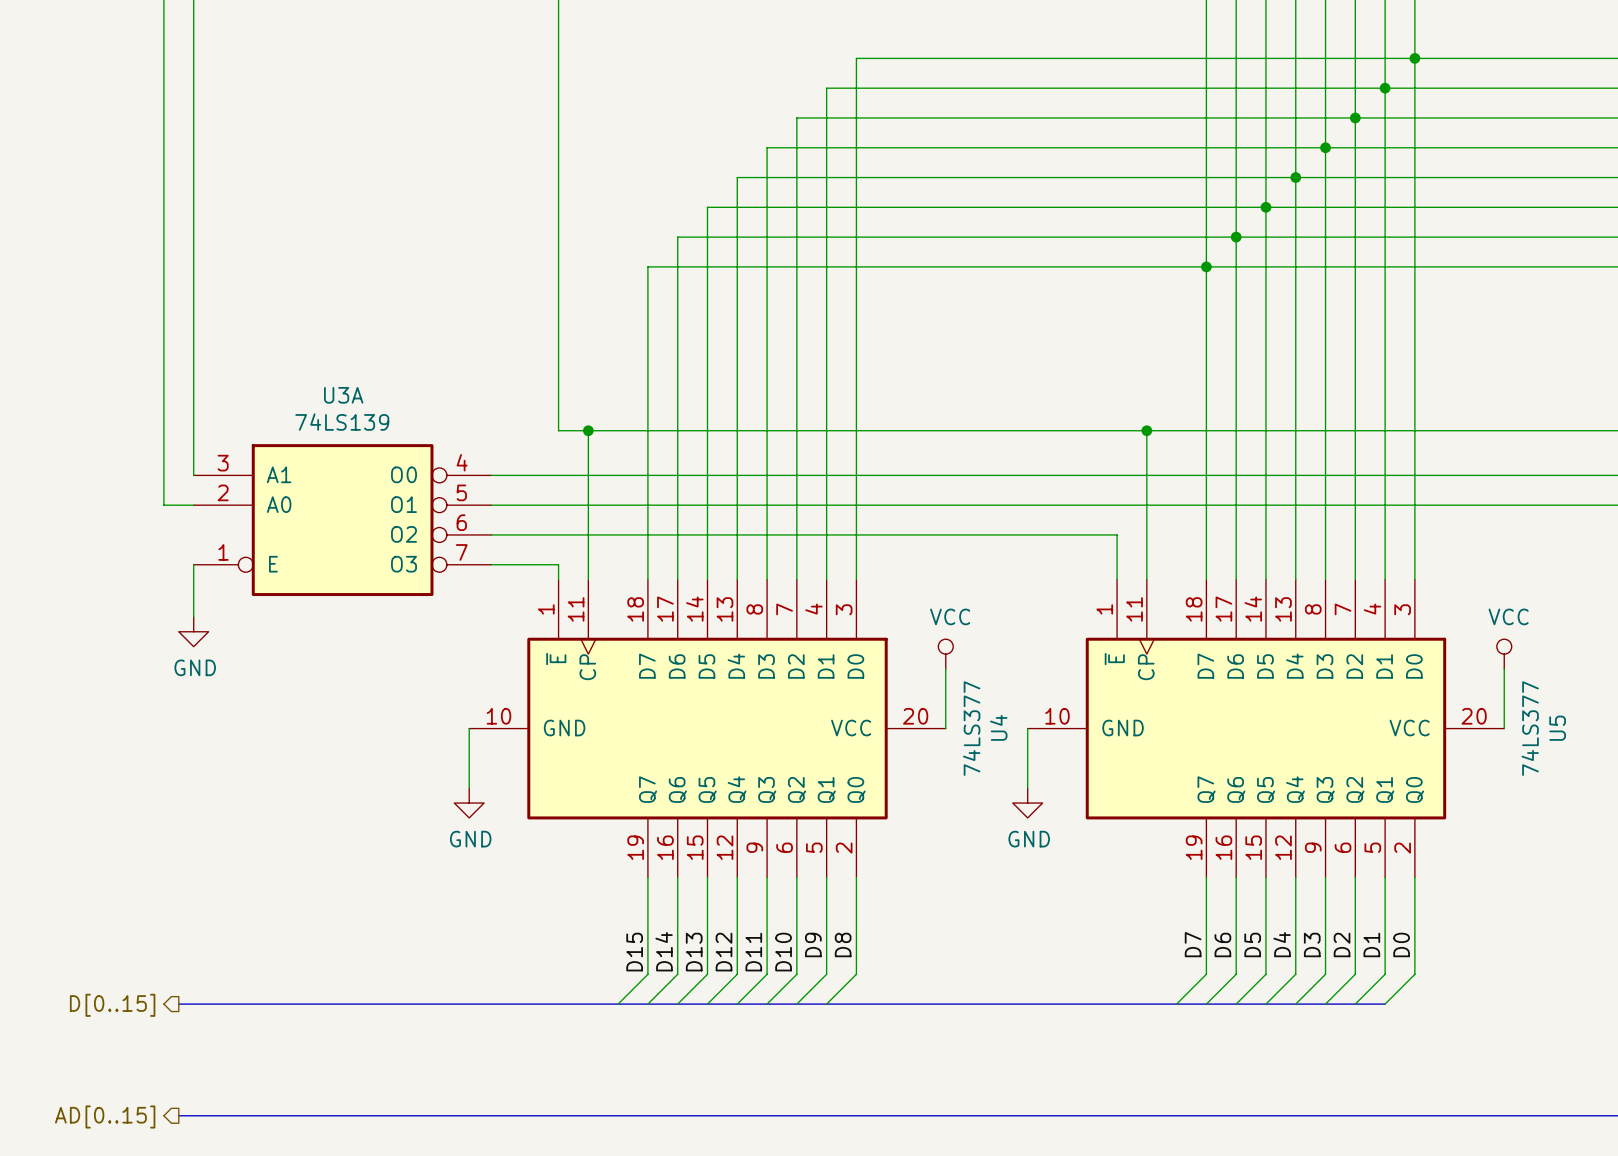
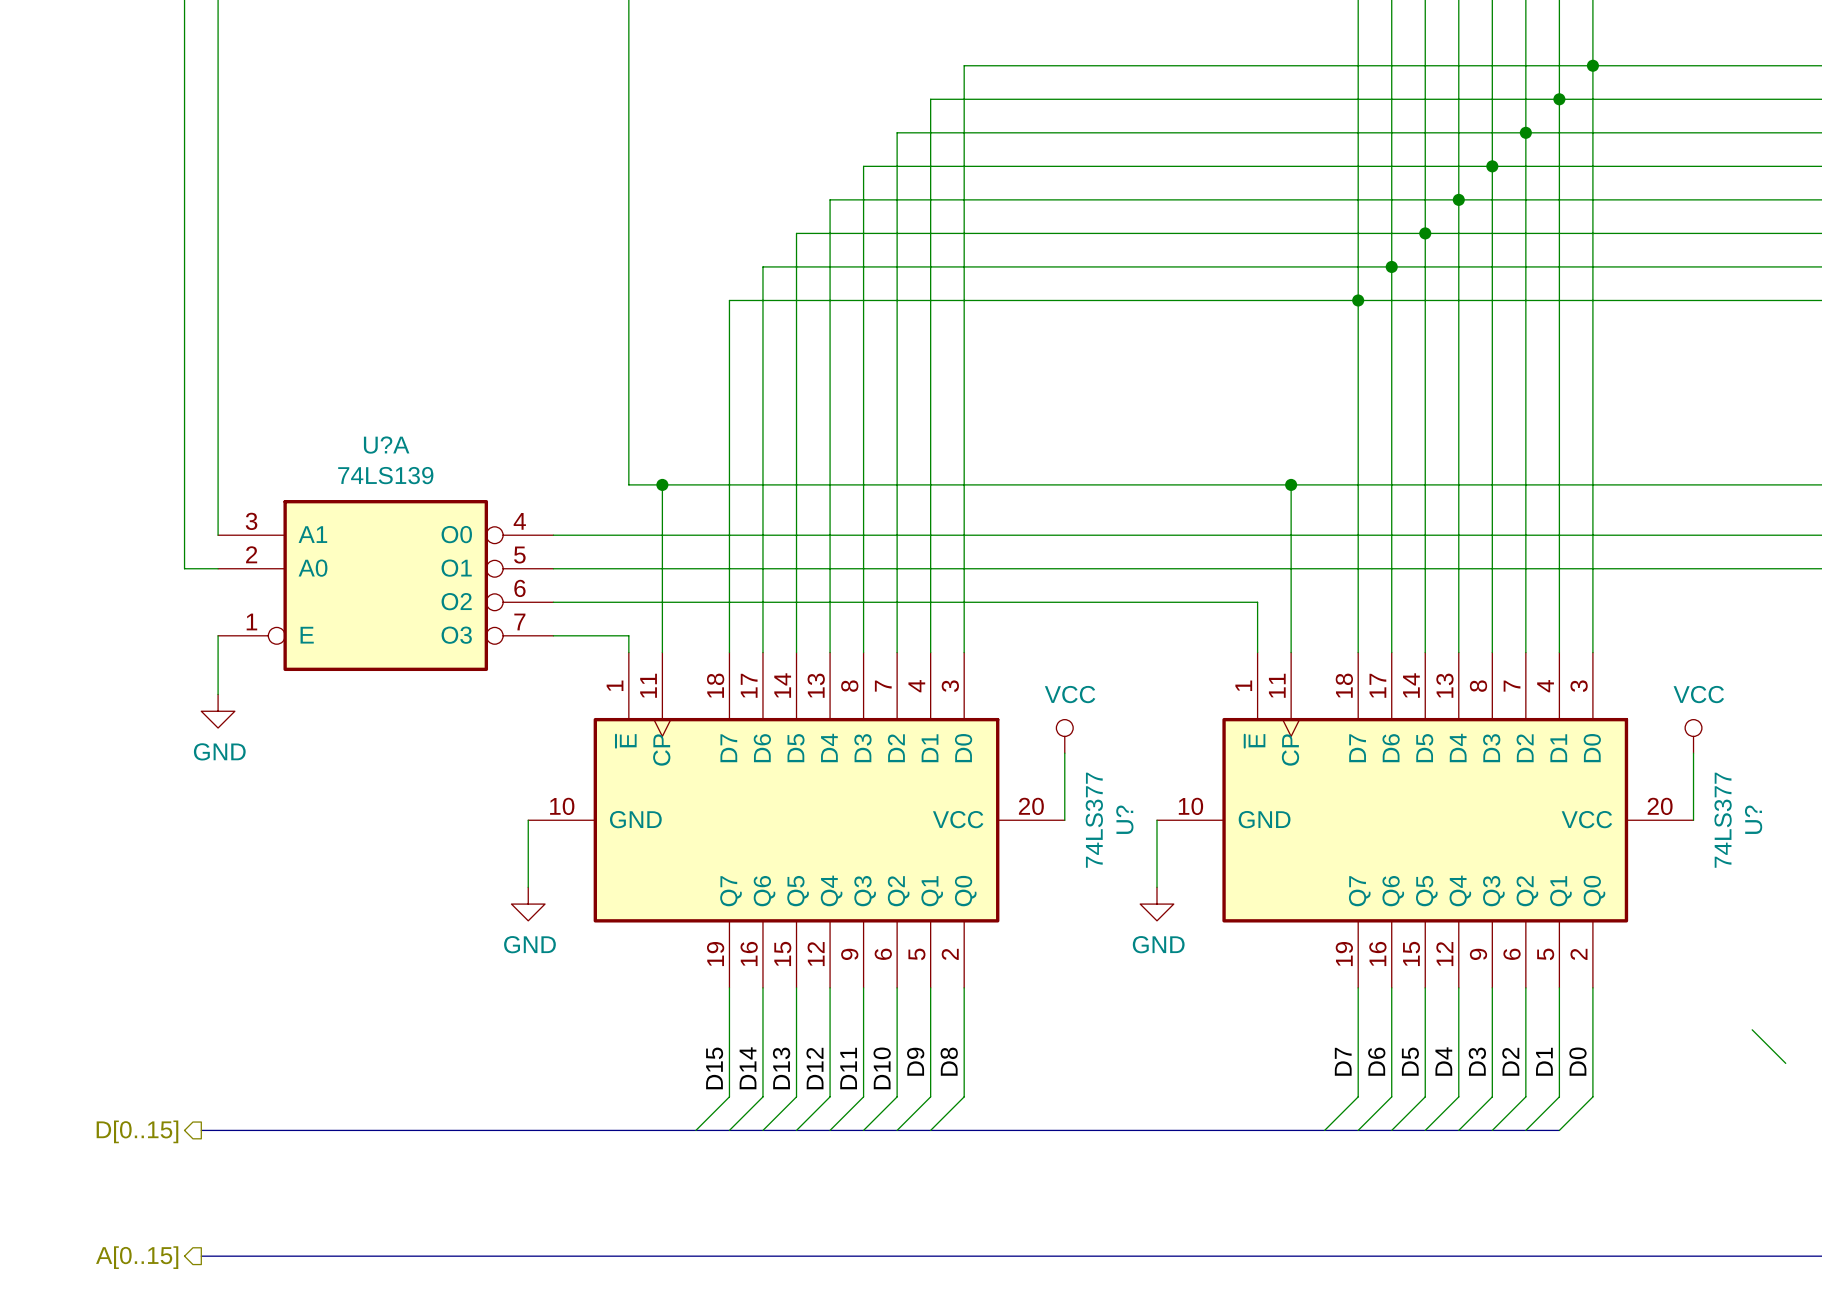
U3A name: U3A (343, 395) -> U?A (386, 445)
U4 name: U4 (998, 727) -> U? (1124, 819)
U5 name: U5 (1557, 728) -> U? (1753, 819)
wire: none -> (1752, 1029) (1785, 1063)
hierarchical label: AD[0..15] (105, 1117) -> A[0..15] (137, 1257)

